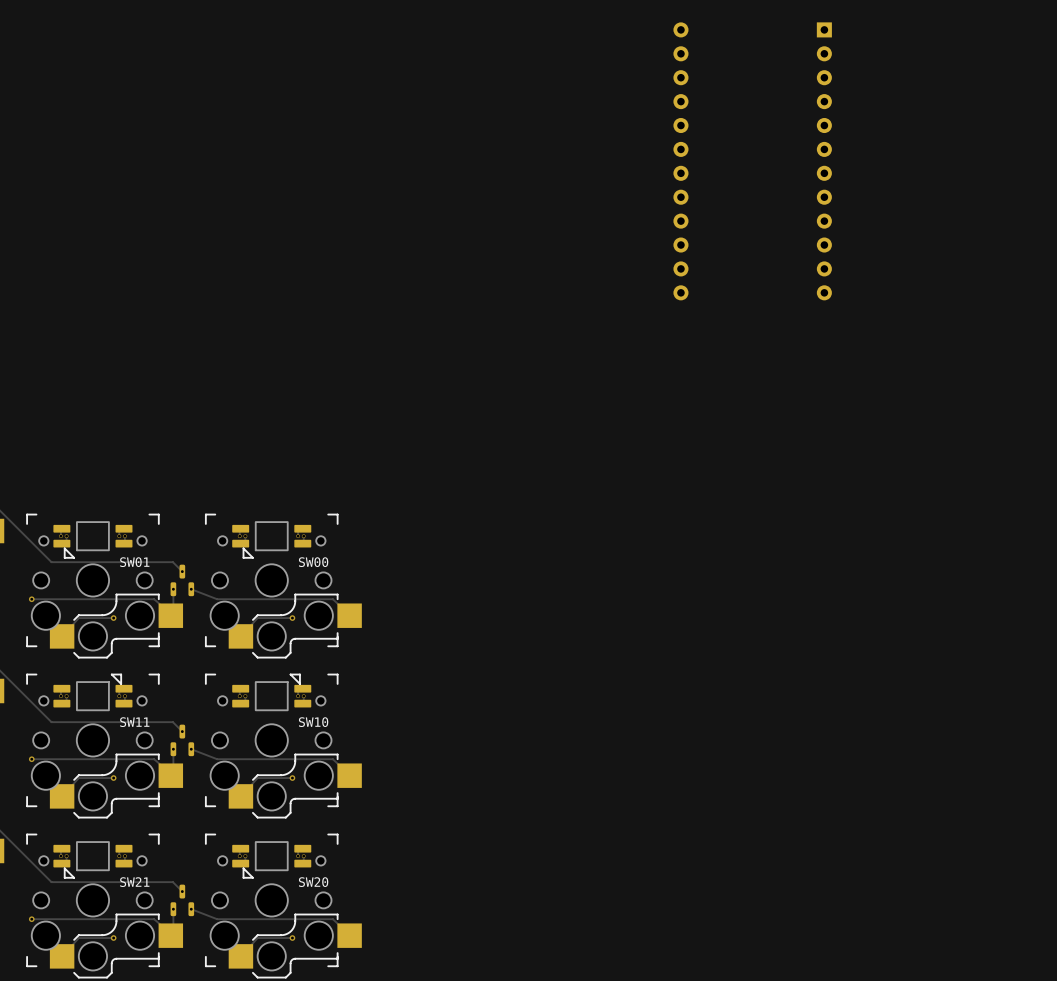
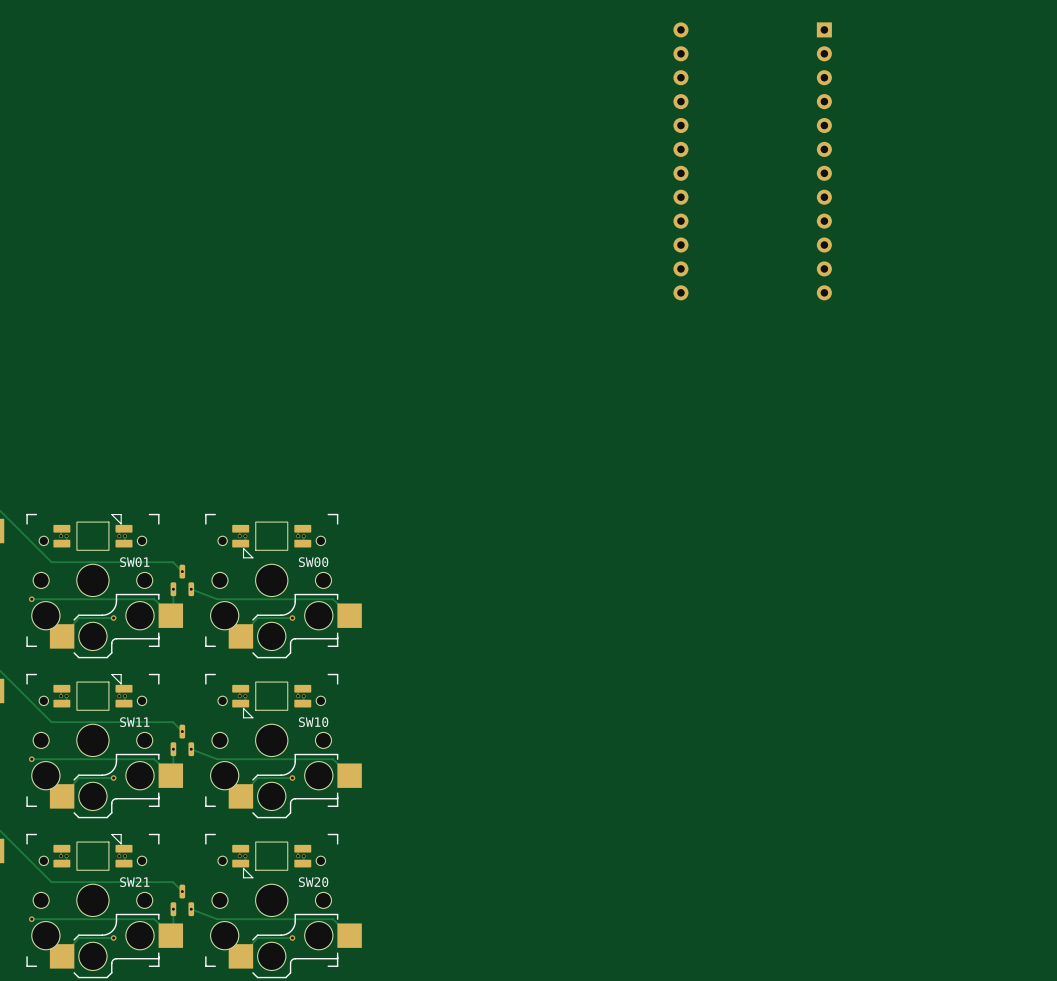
part rotation: 0° (92, 540) -> 180° (92, 532)
part rotation: 0° (271, 692) -> 180° (271, 700)
part rotation: 0° (92, 860) -> 180° (92, 852)

